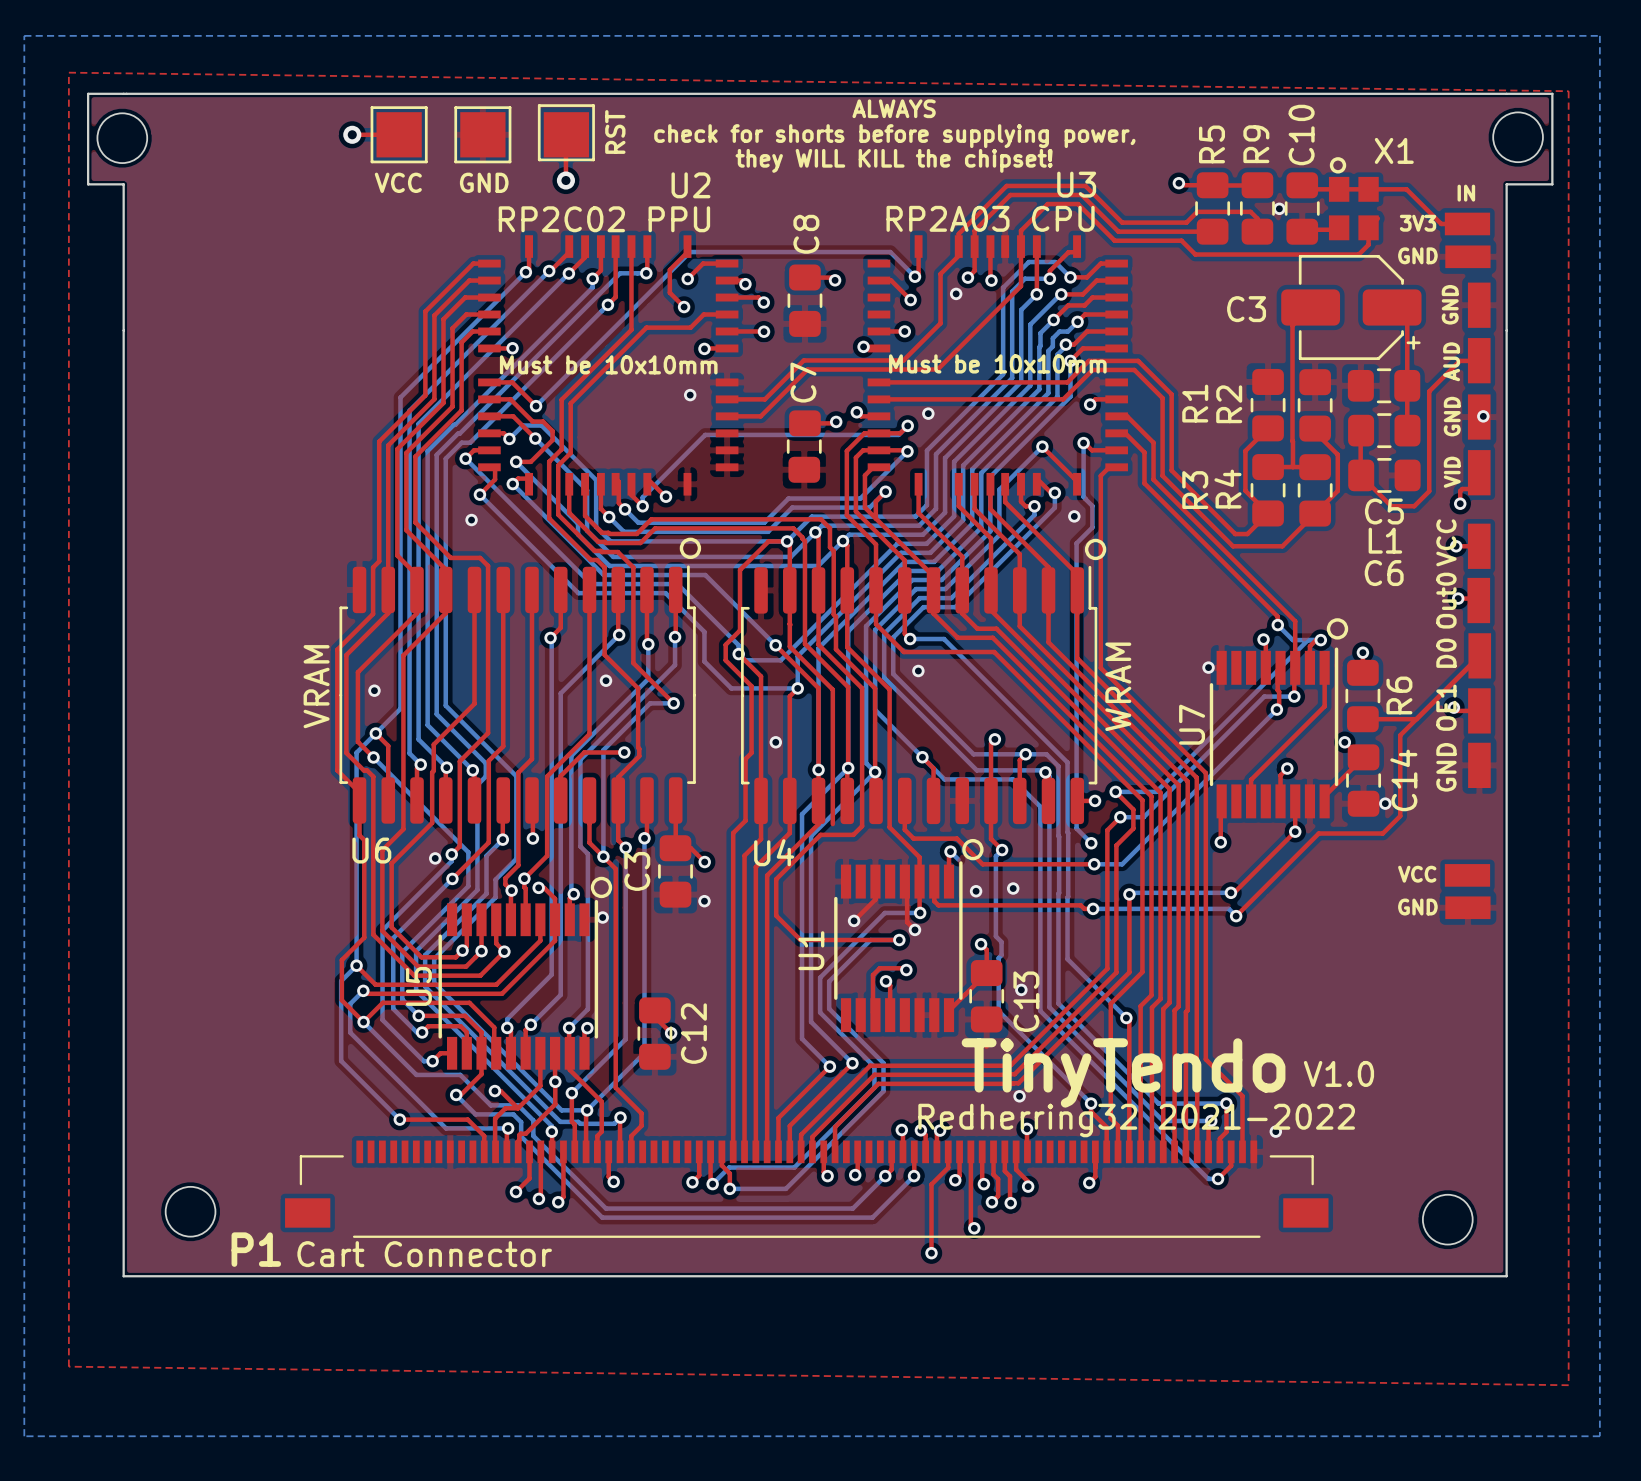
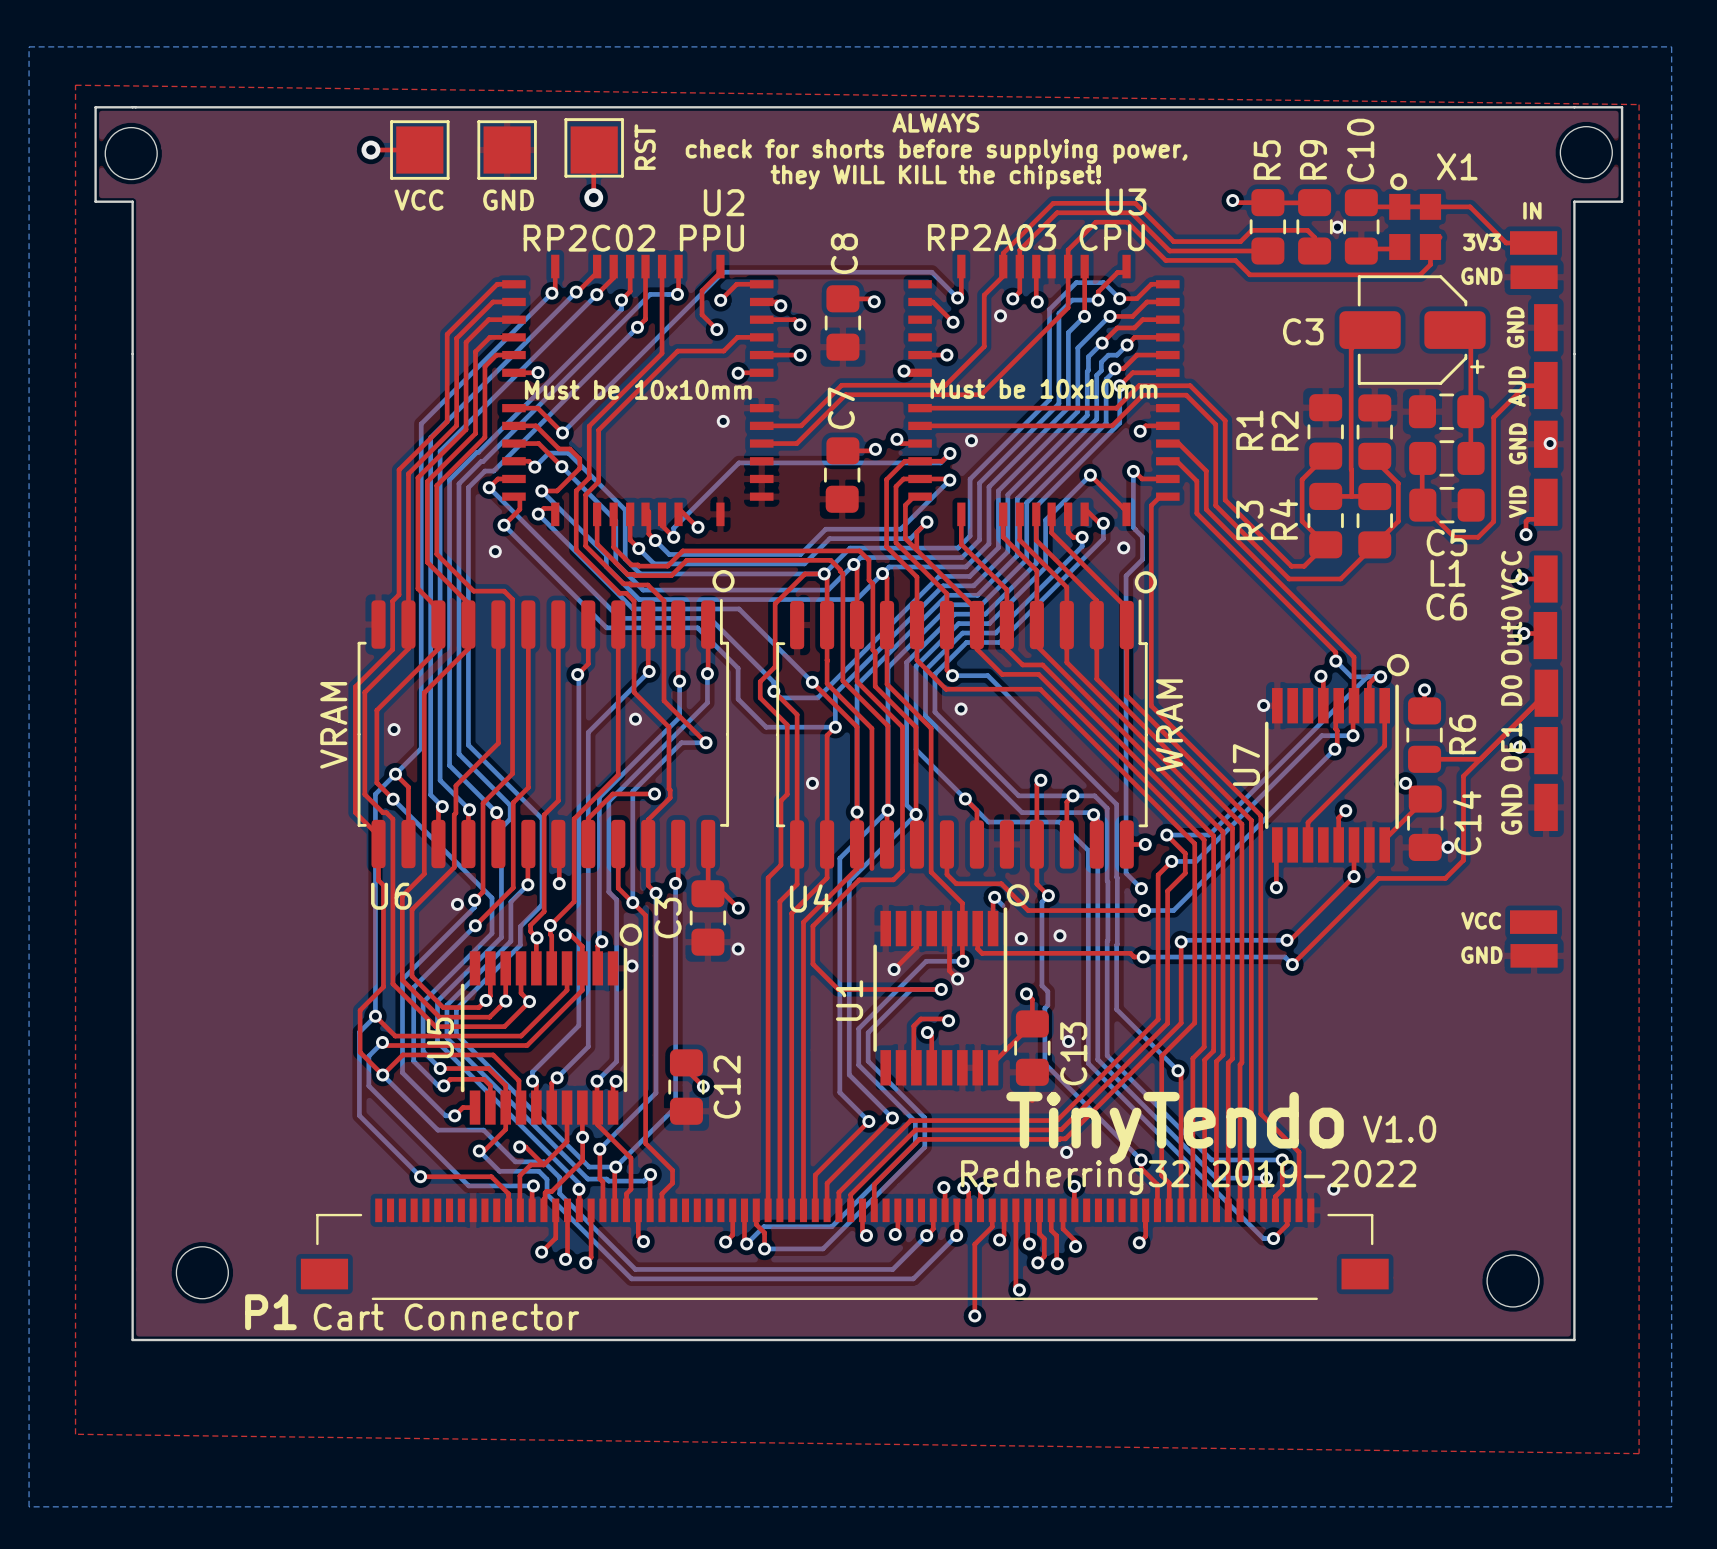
text: Redherring32 2021-2022 (1136, 1120) -> Redherring32 2019-2022 (1188, 1177)

